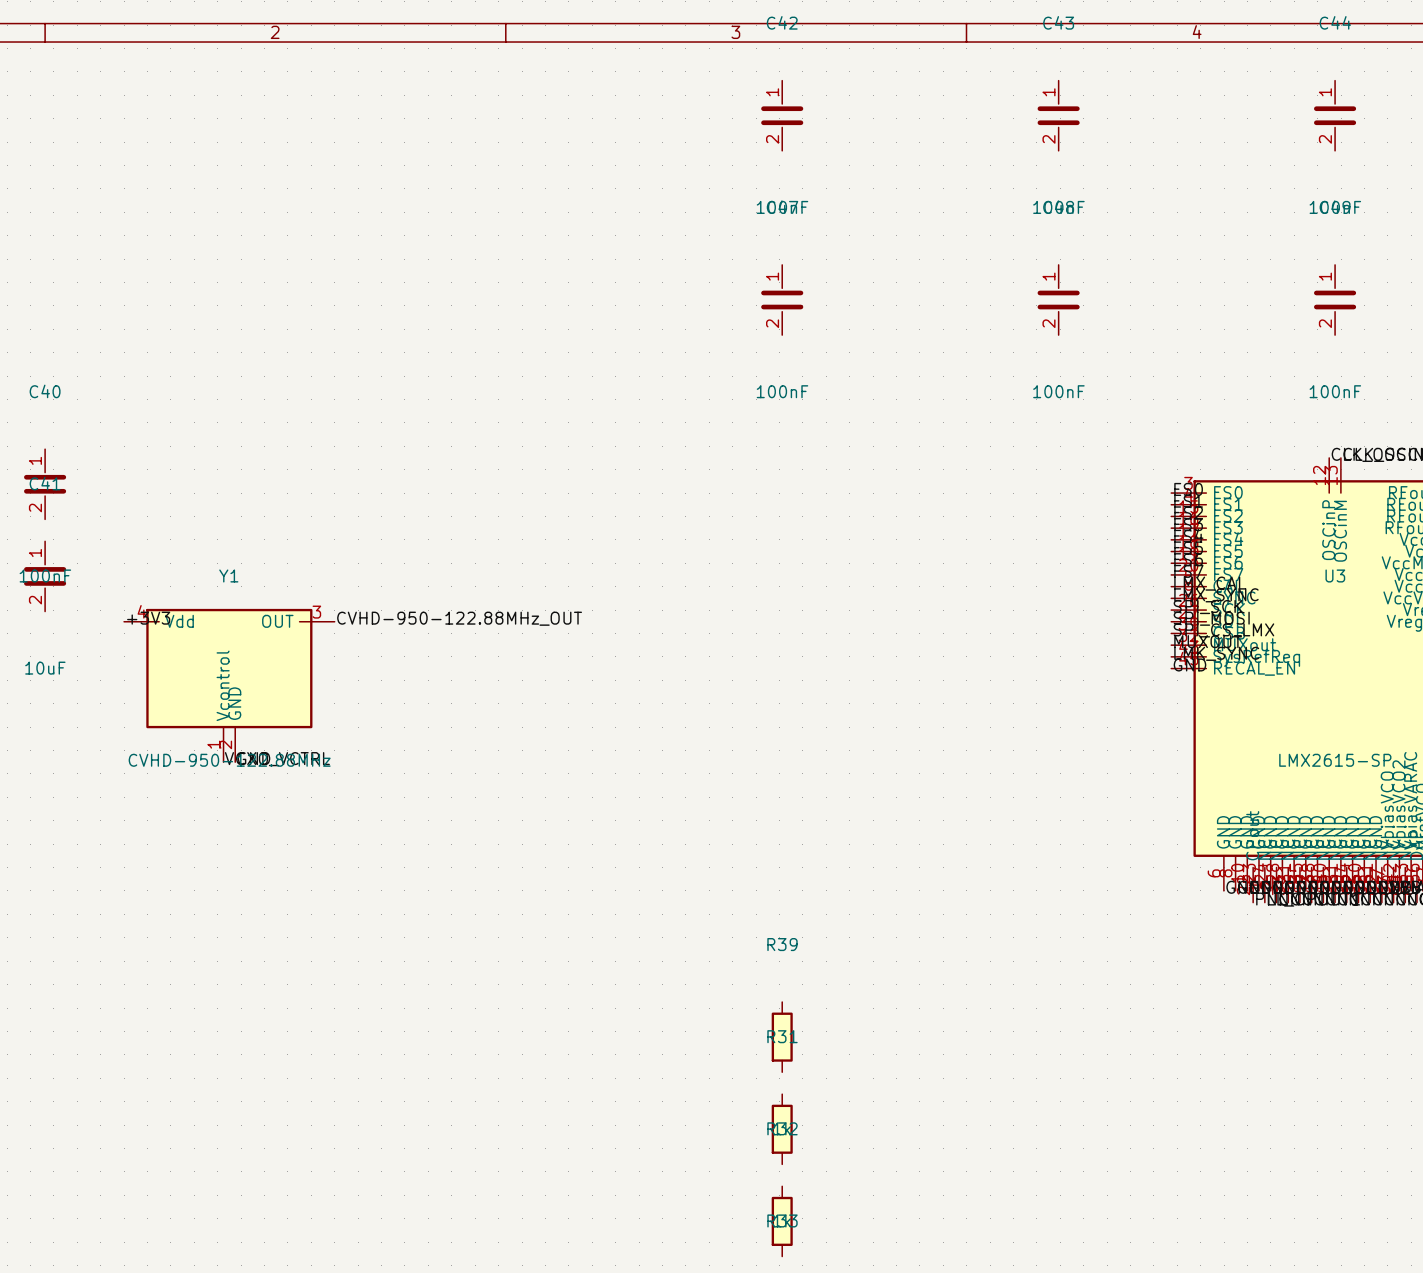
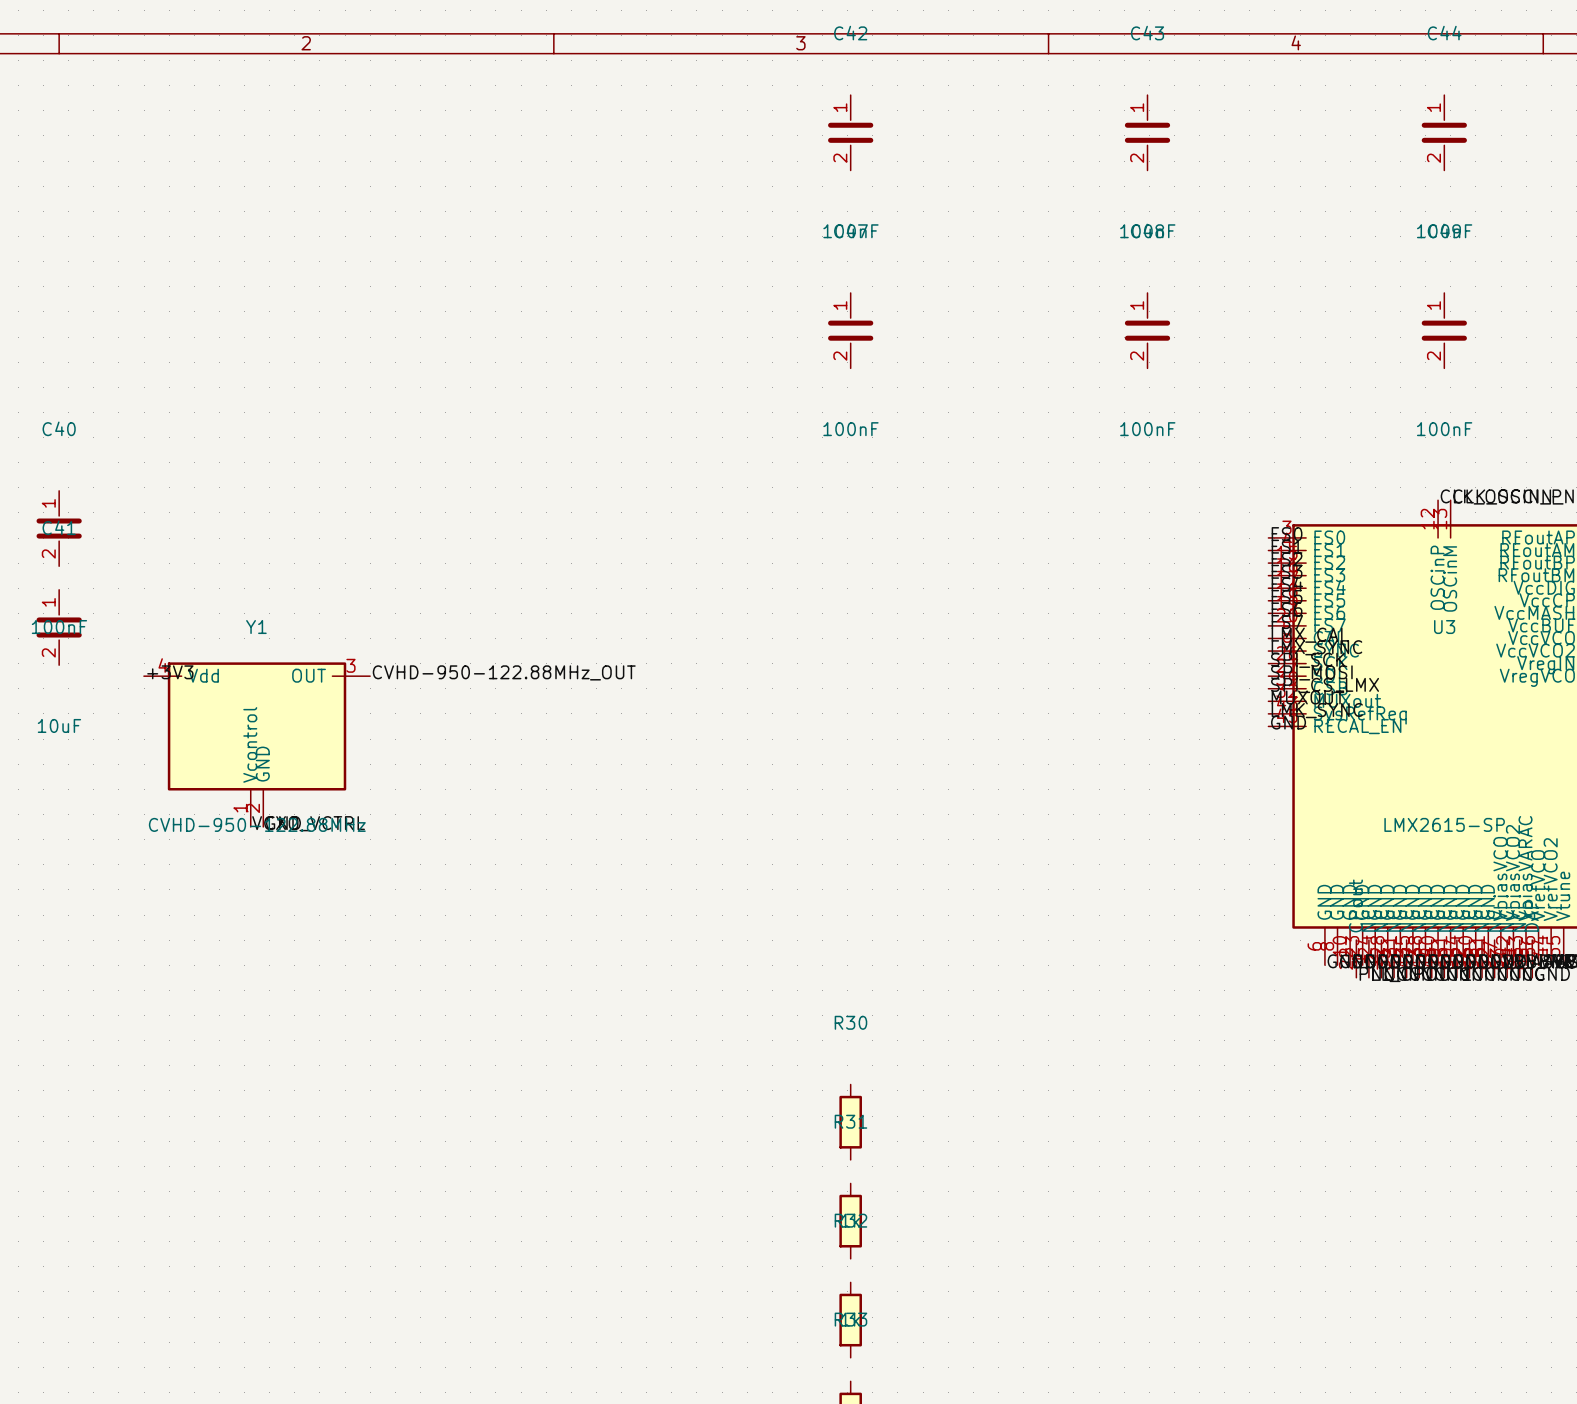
R39 name: R39 (782, 944) -> R30 (850, 1022)

